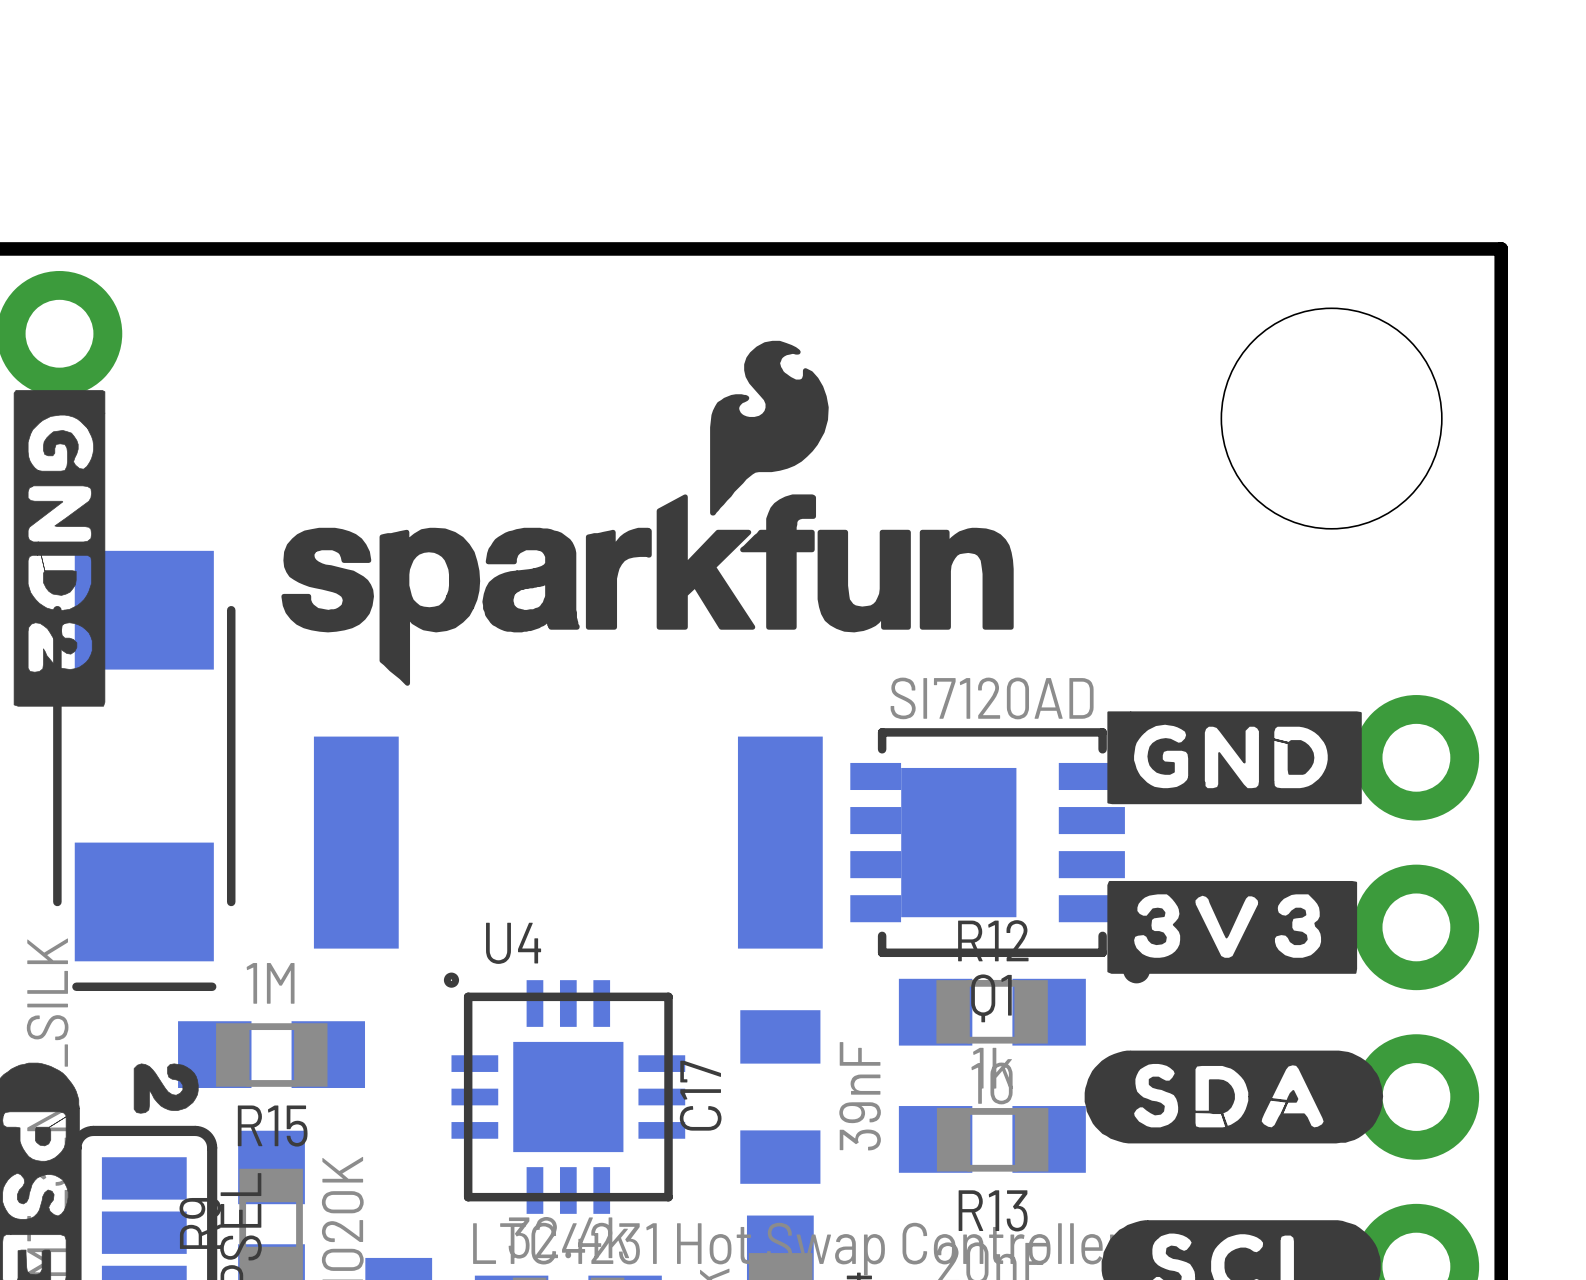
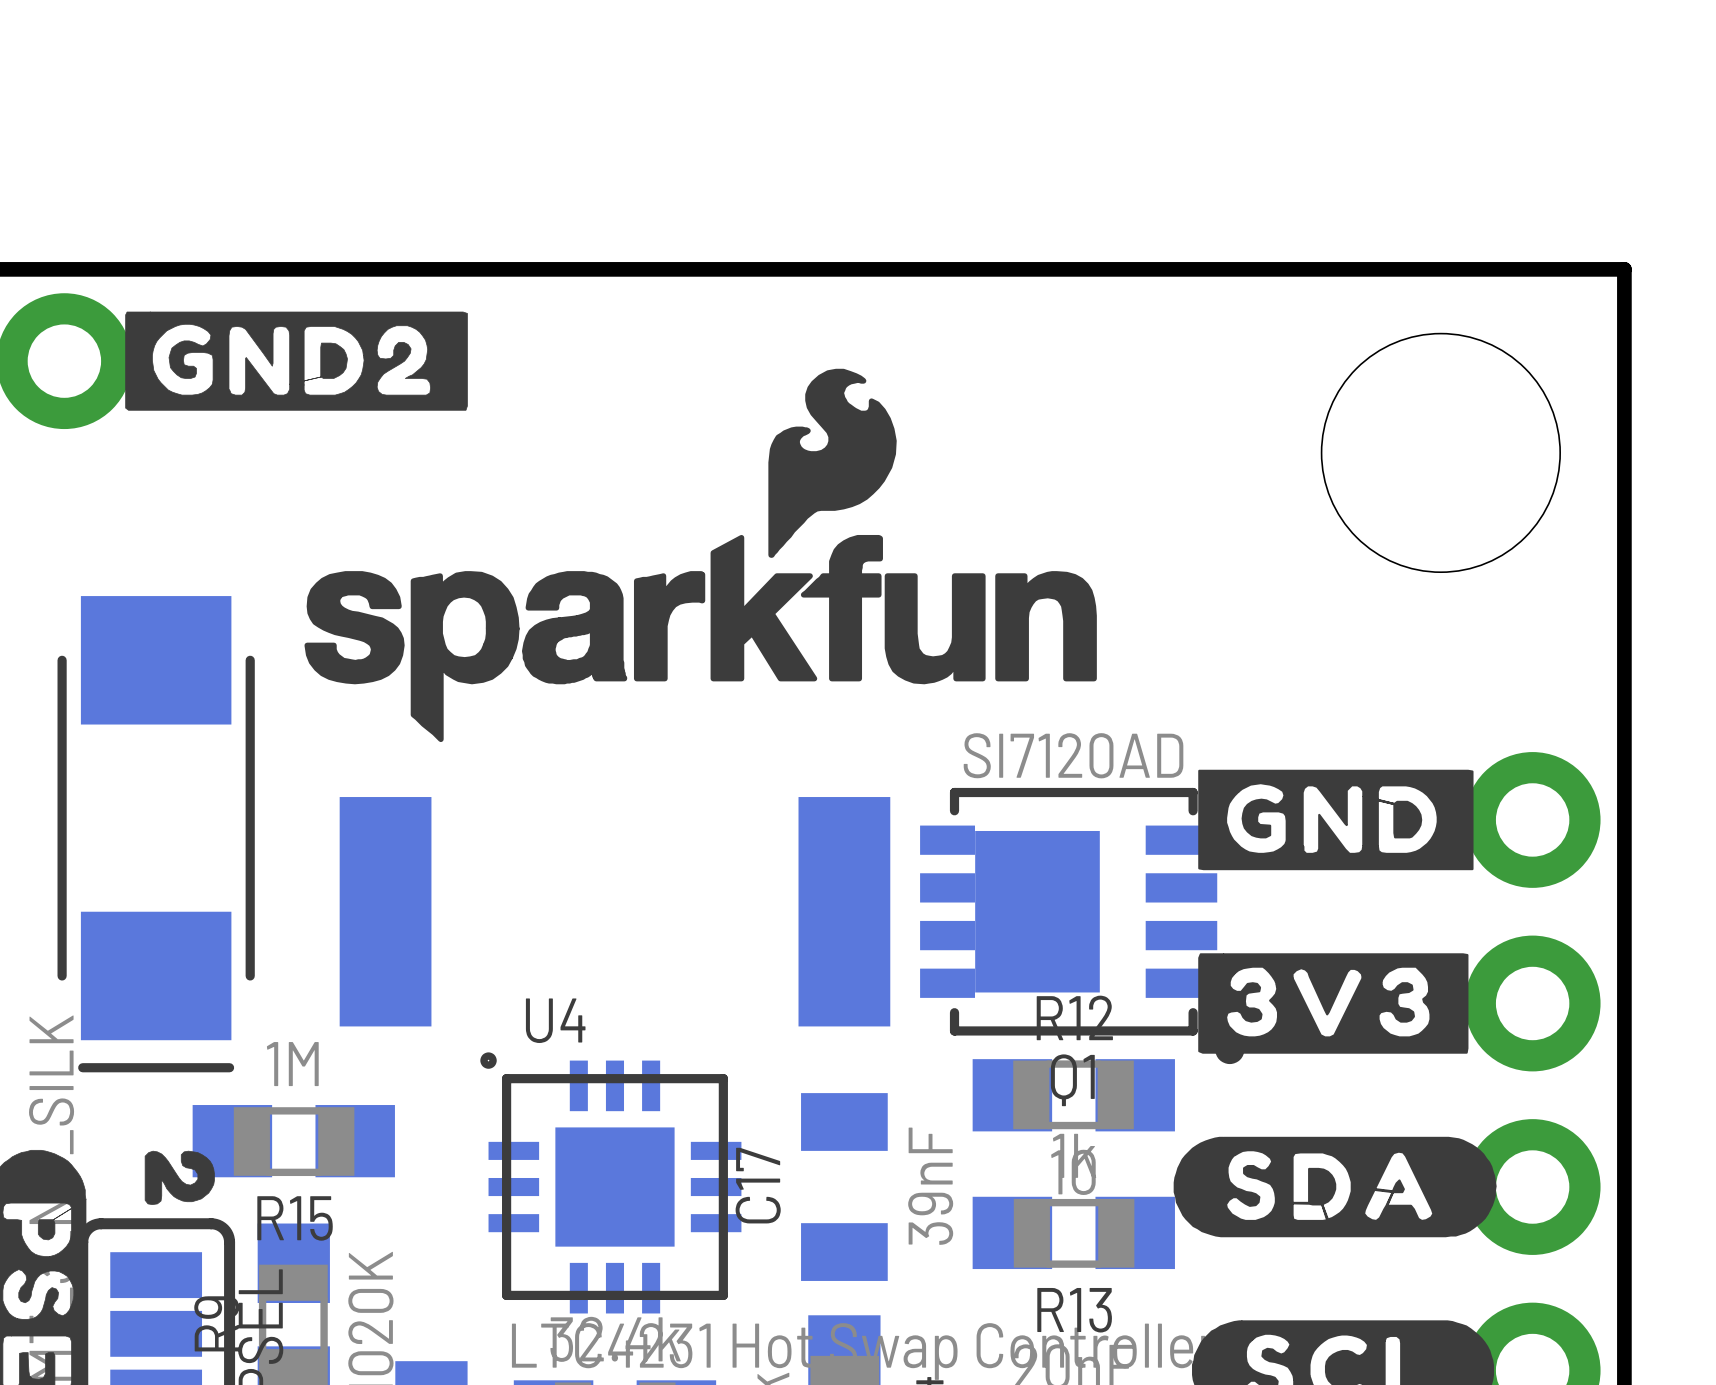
drawing: none -> [125, 311, 468, 411]
drawing: [13, 390, 106, 707] -> none

